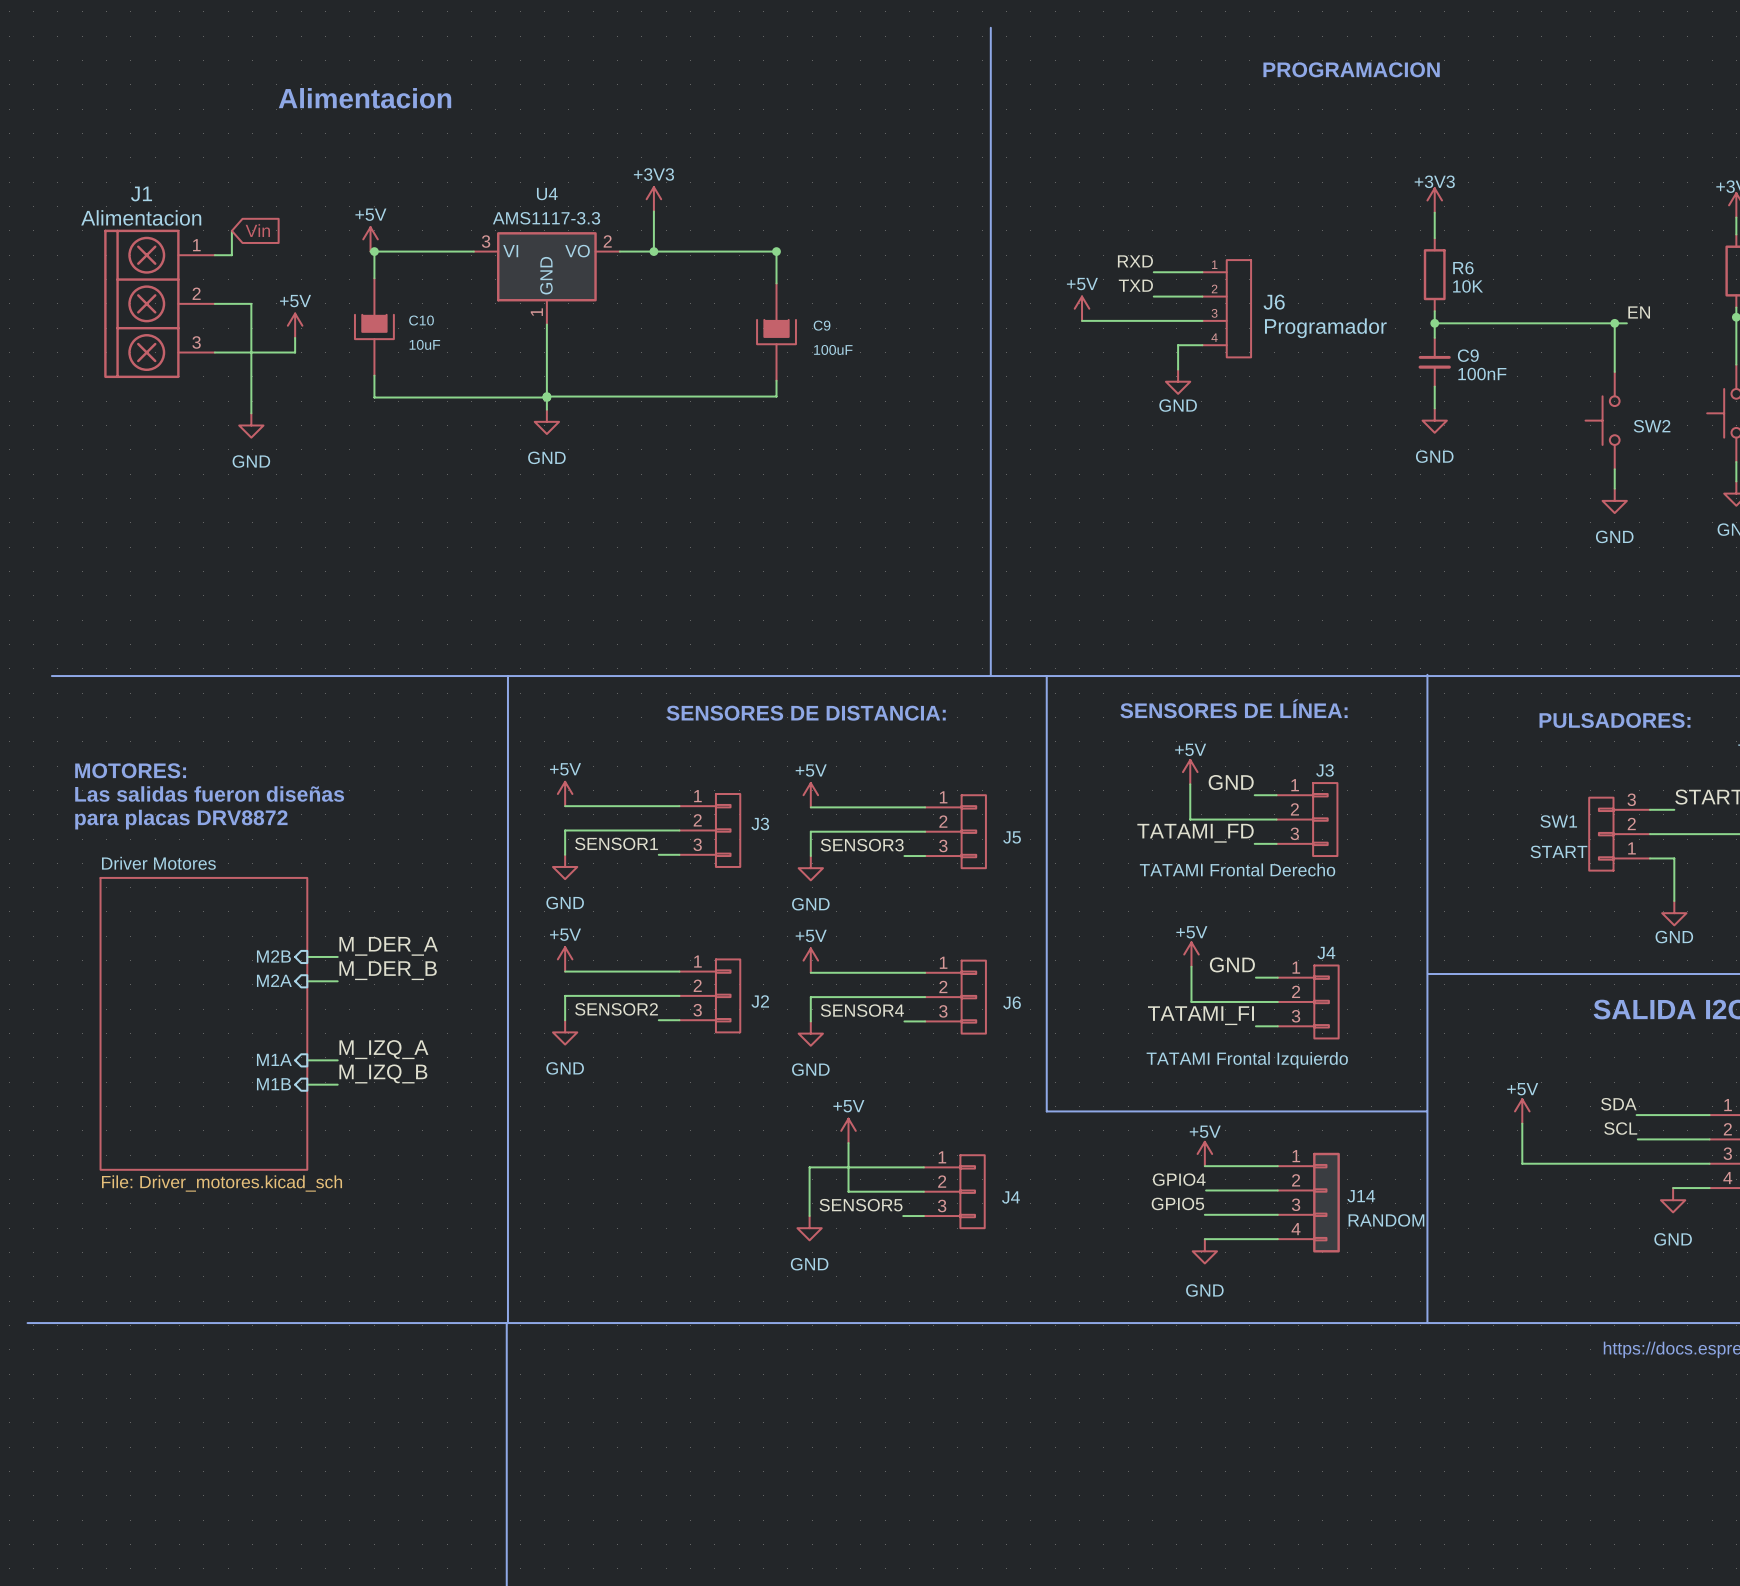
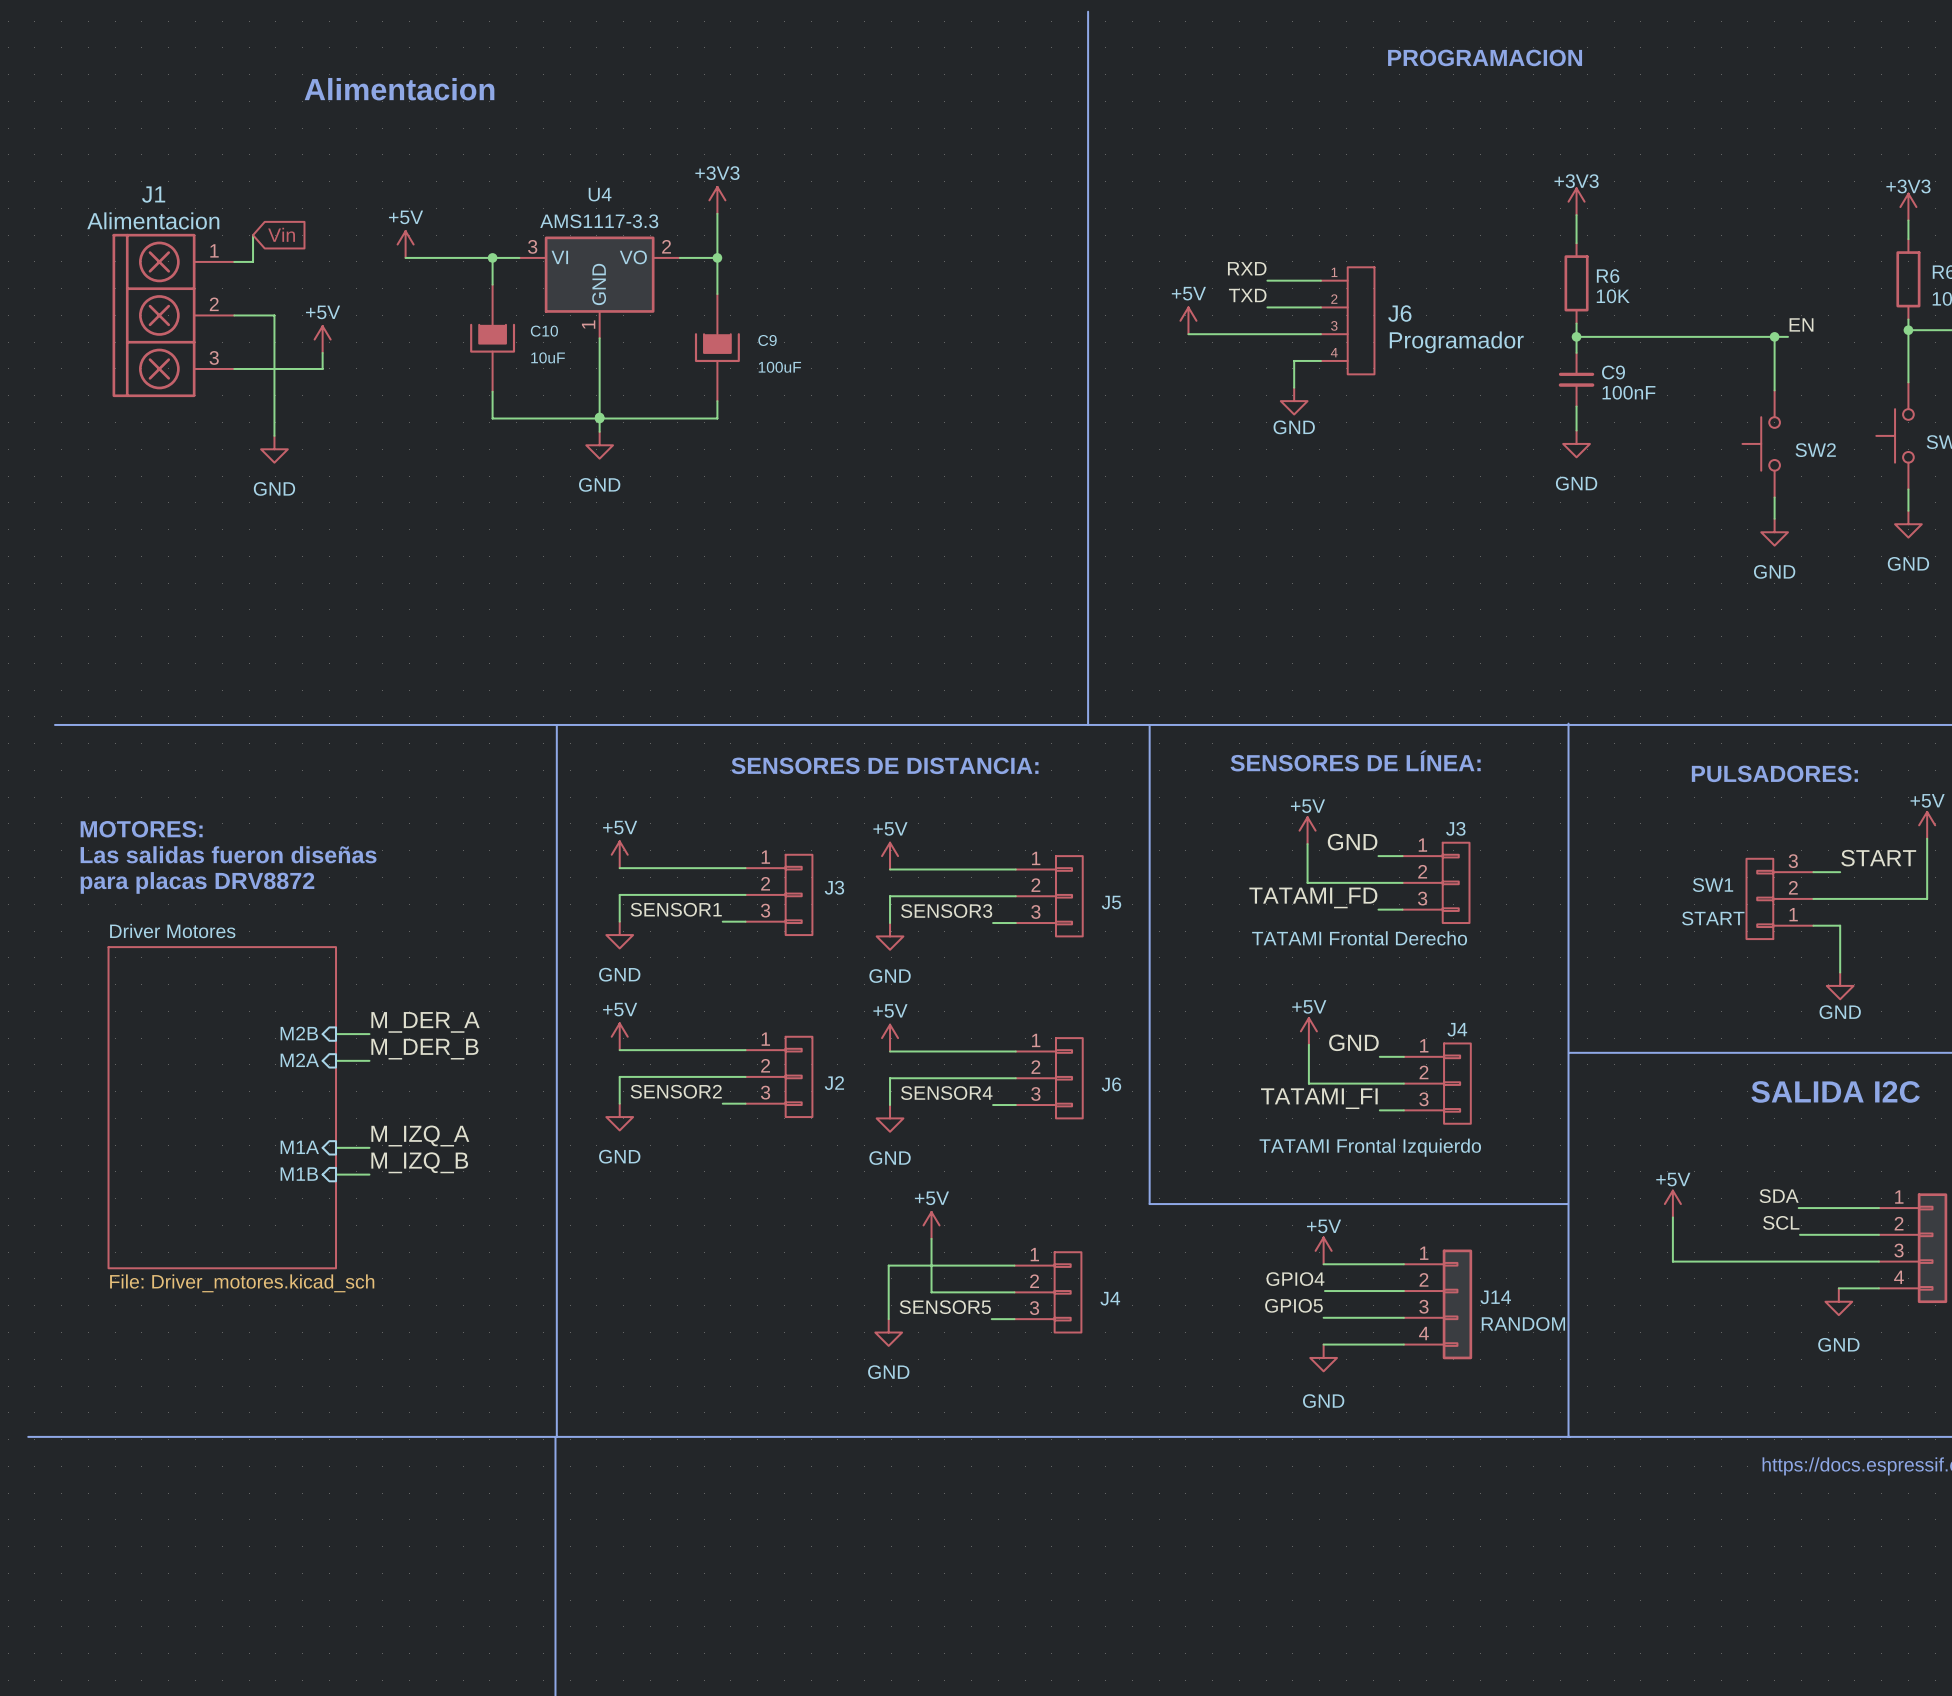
wire: (776, 250) (776, 283) -> none
wire: (374, 251) (374, 278) -> none
junction: (374, 251) -> none
wire: none -> (492, 257) (492, 284)
junction: none -> (492, 257)
wire: (653, 251) (776, 251) -> (717, 257) (717, 294)
junction: (776, 251) -> none
C10 position: (374, 326) -> (492, 338)
C9 position: (776, 332) -> (717, 347)
wire: (374, 375) (374, 397) (449, 397) -> (492, 391) (492, 418)
wire: (776, 380) (776, 396) (546, 396) -> none
wire: none -> (717, 401) (717, 418) (599, 418)

